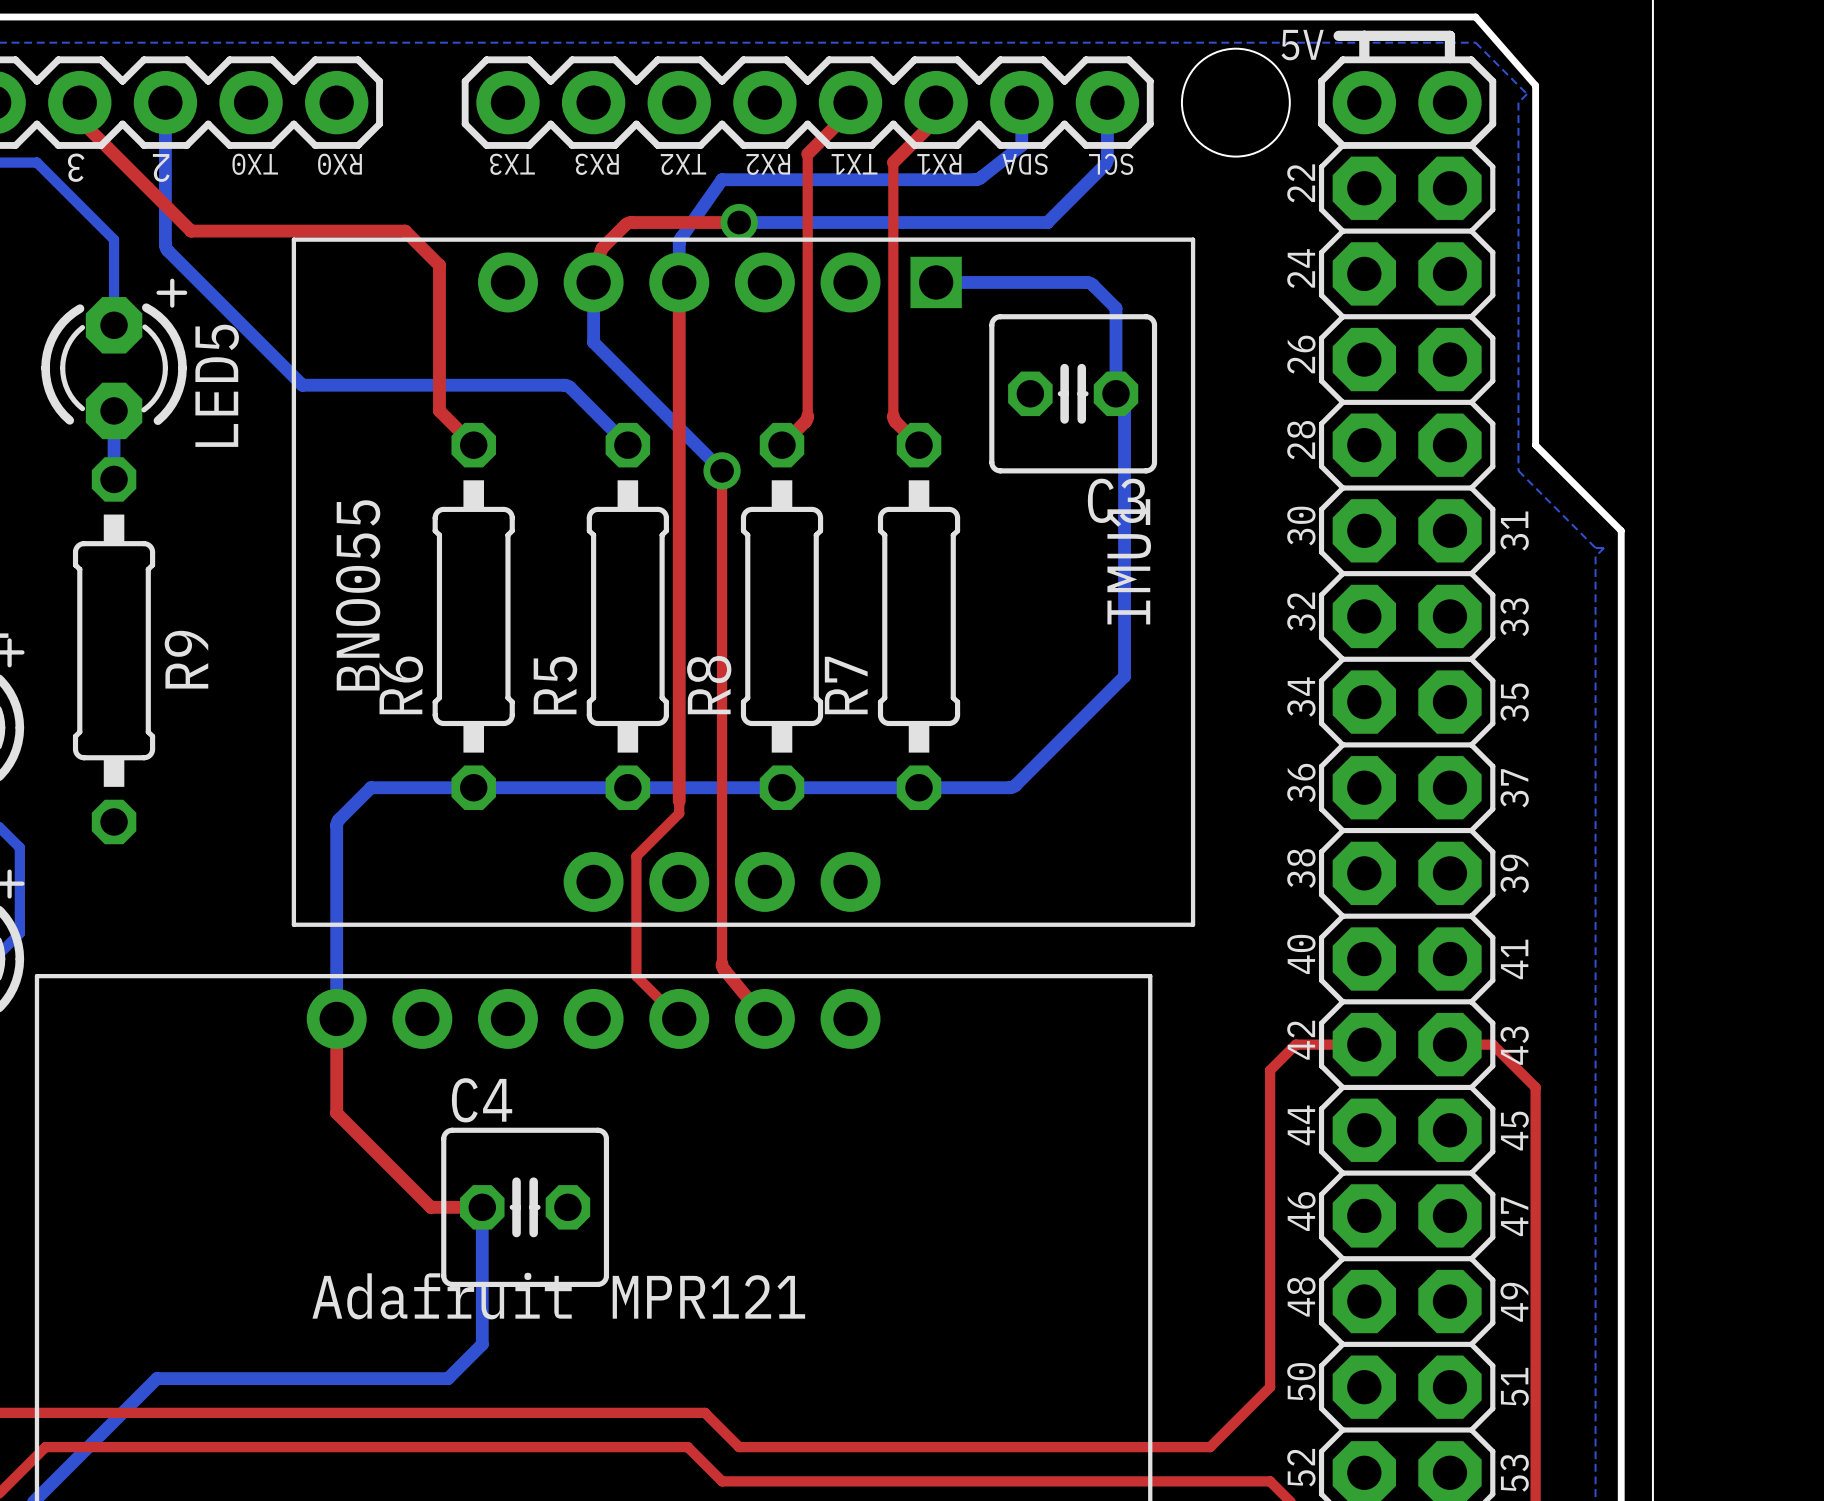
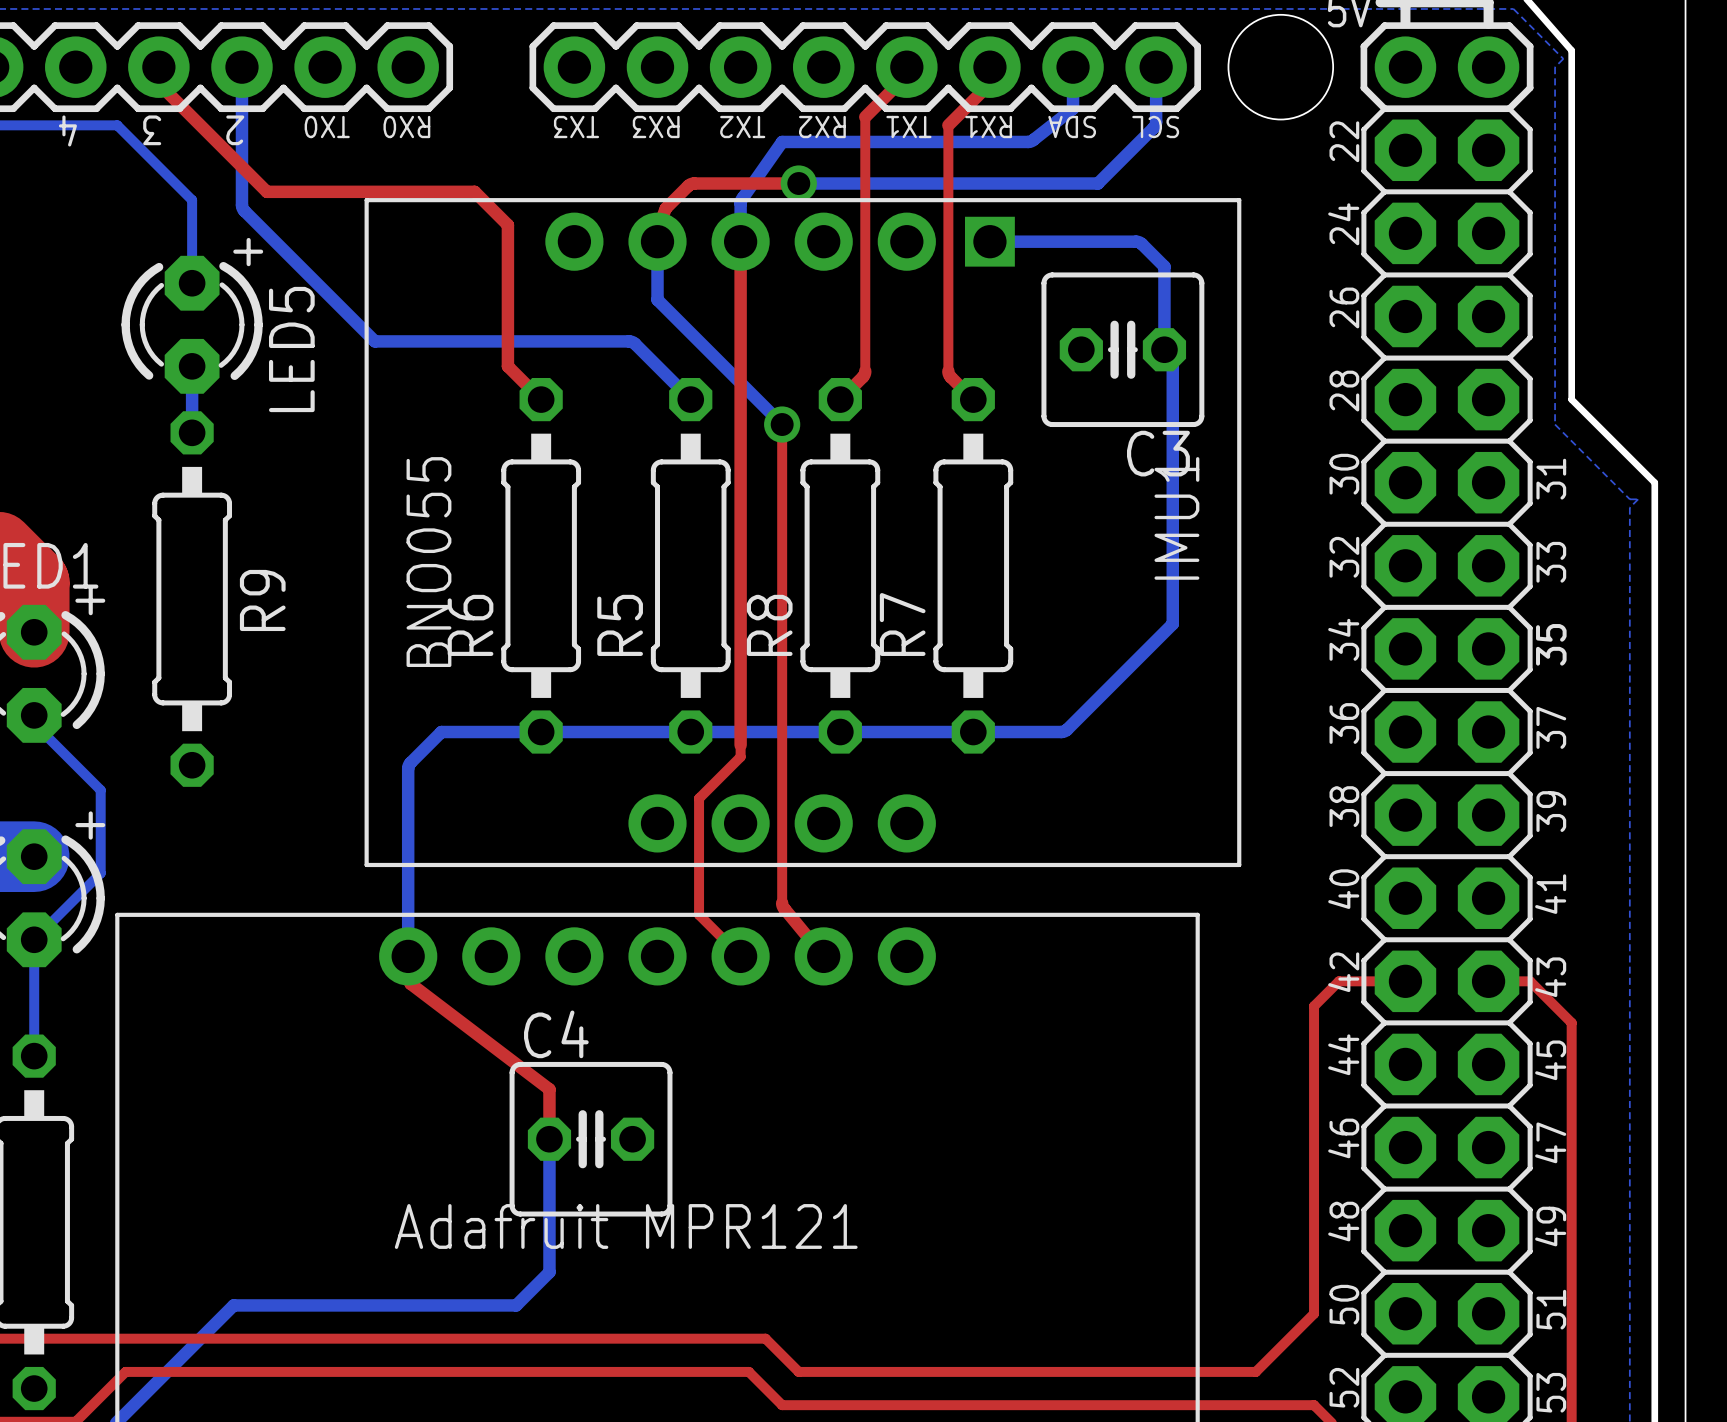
top track: (336, 1018) (336, 1113) (430, 1207) (482, 1207) -> (408, 956) (404, 964) (409, 973) (410, 983) (549, 1089) (549, 1139)

